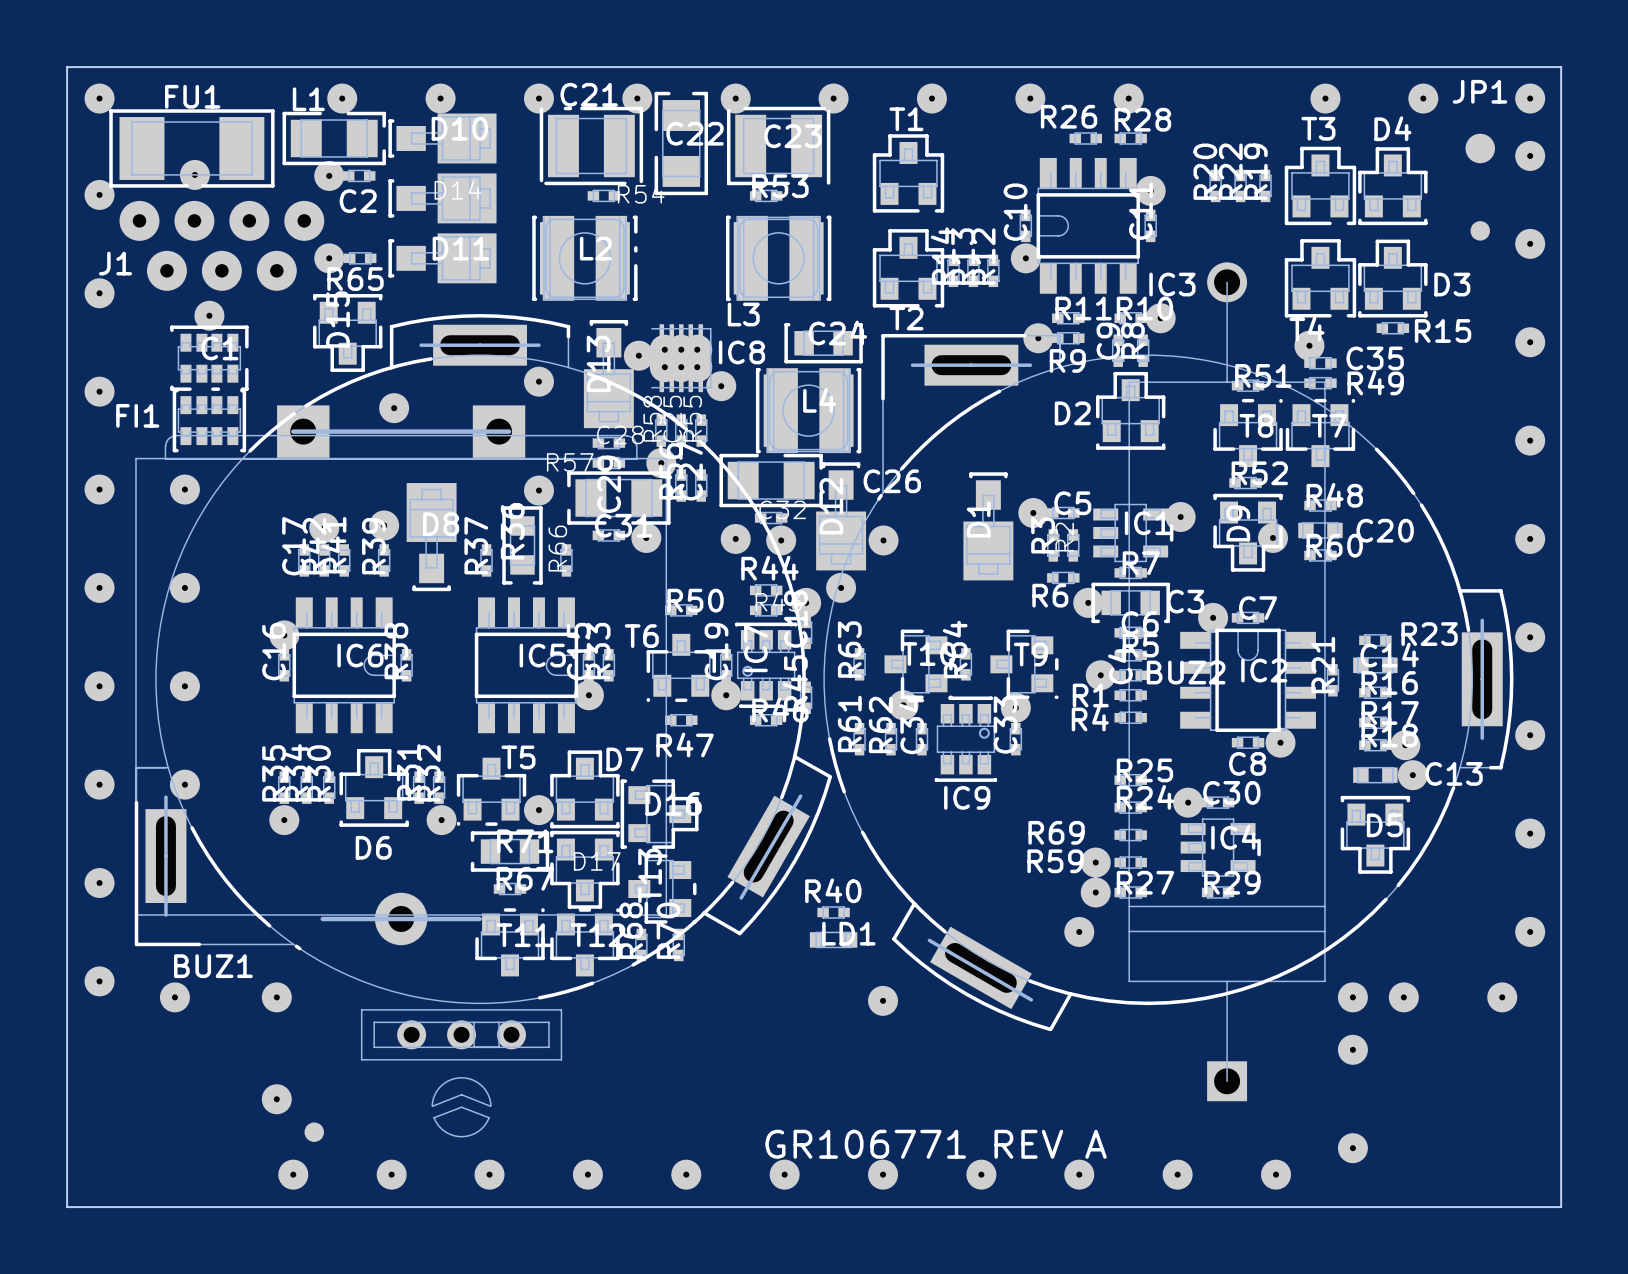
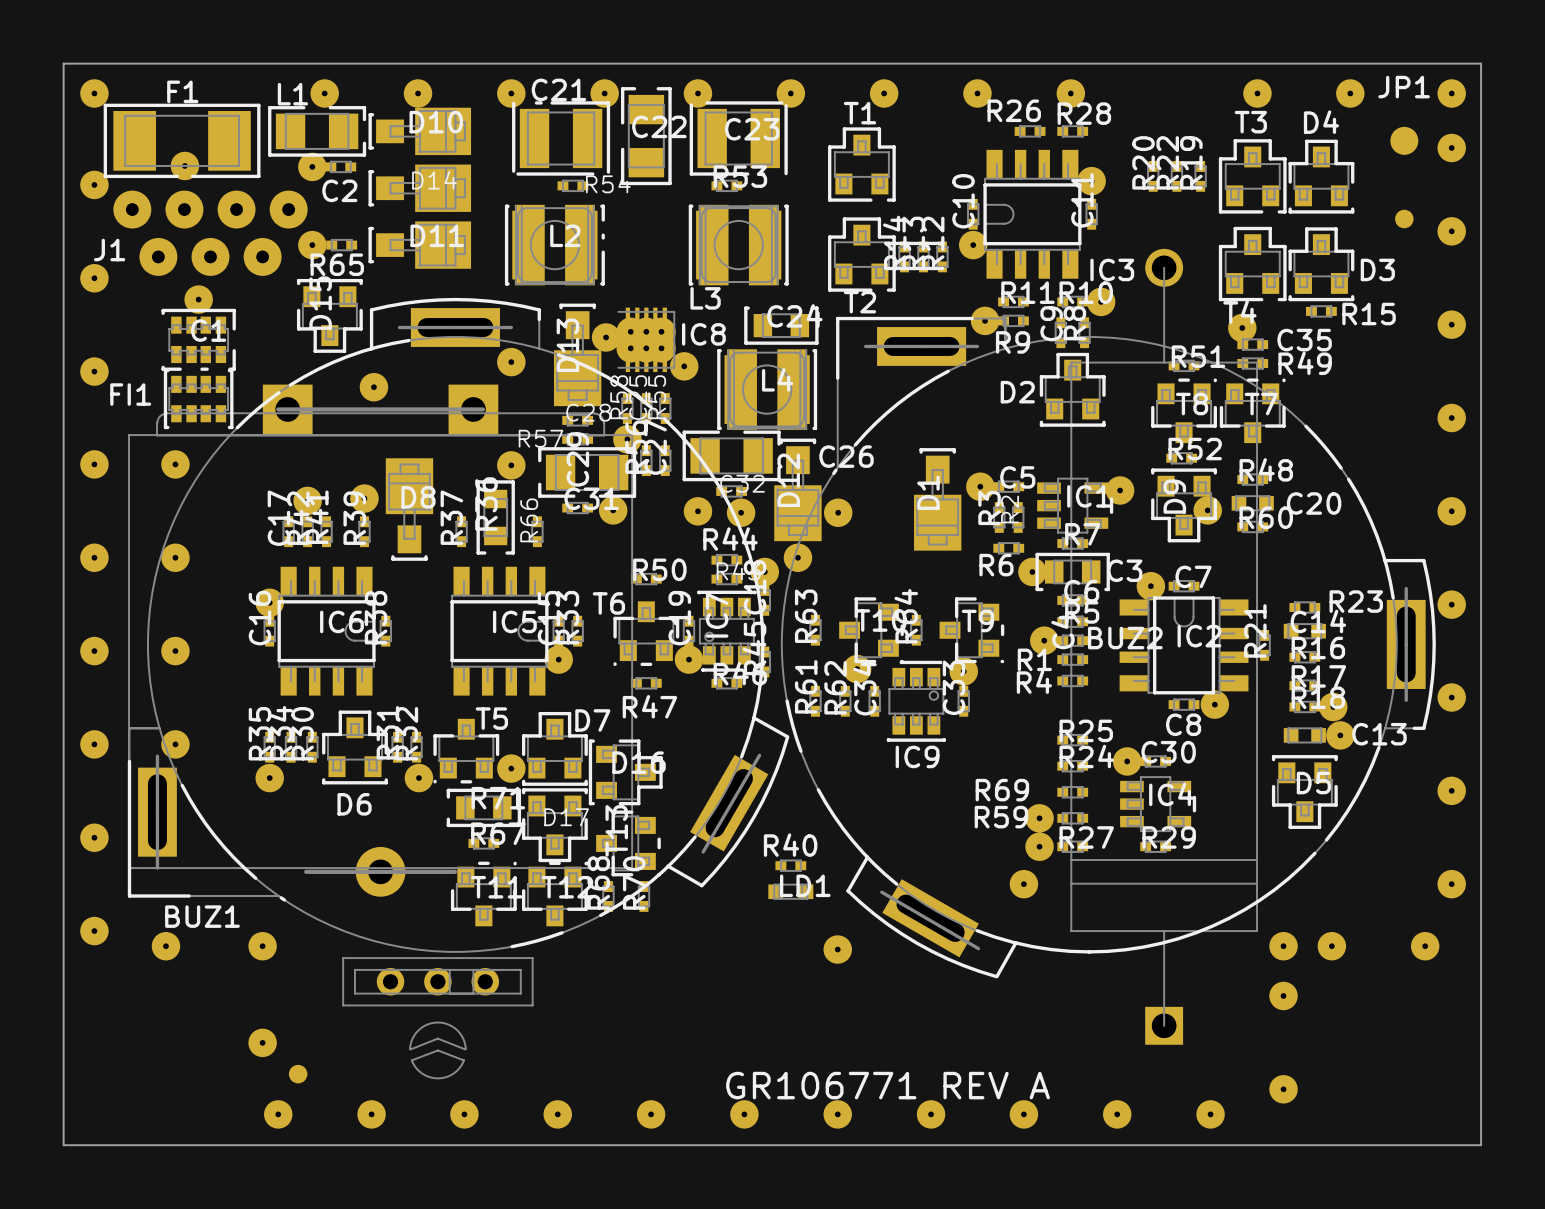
FU1 name: FU1 (192, 96) -> F1 (182, 91)

